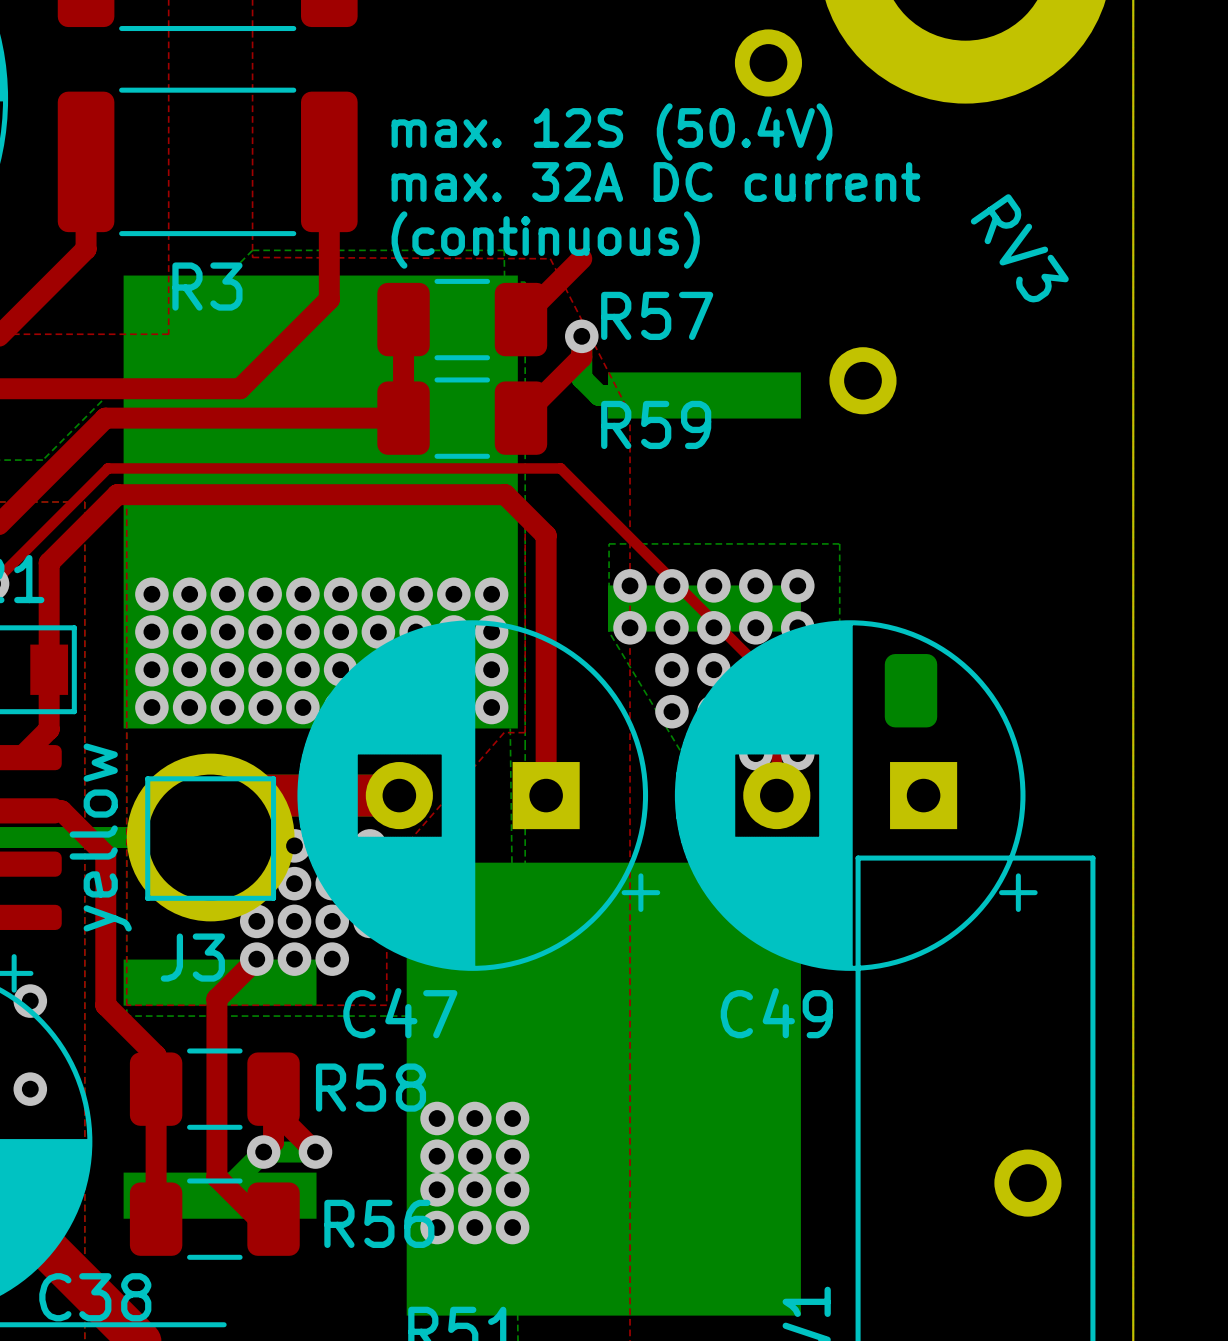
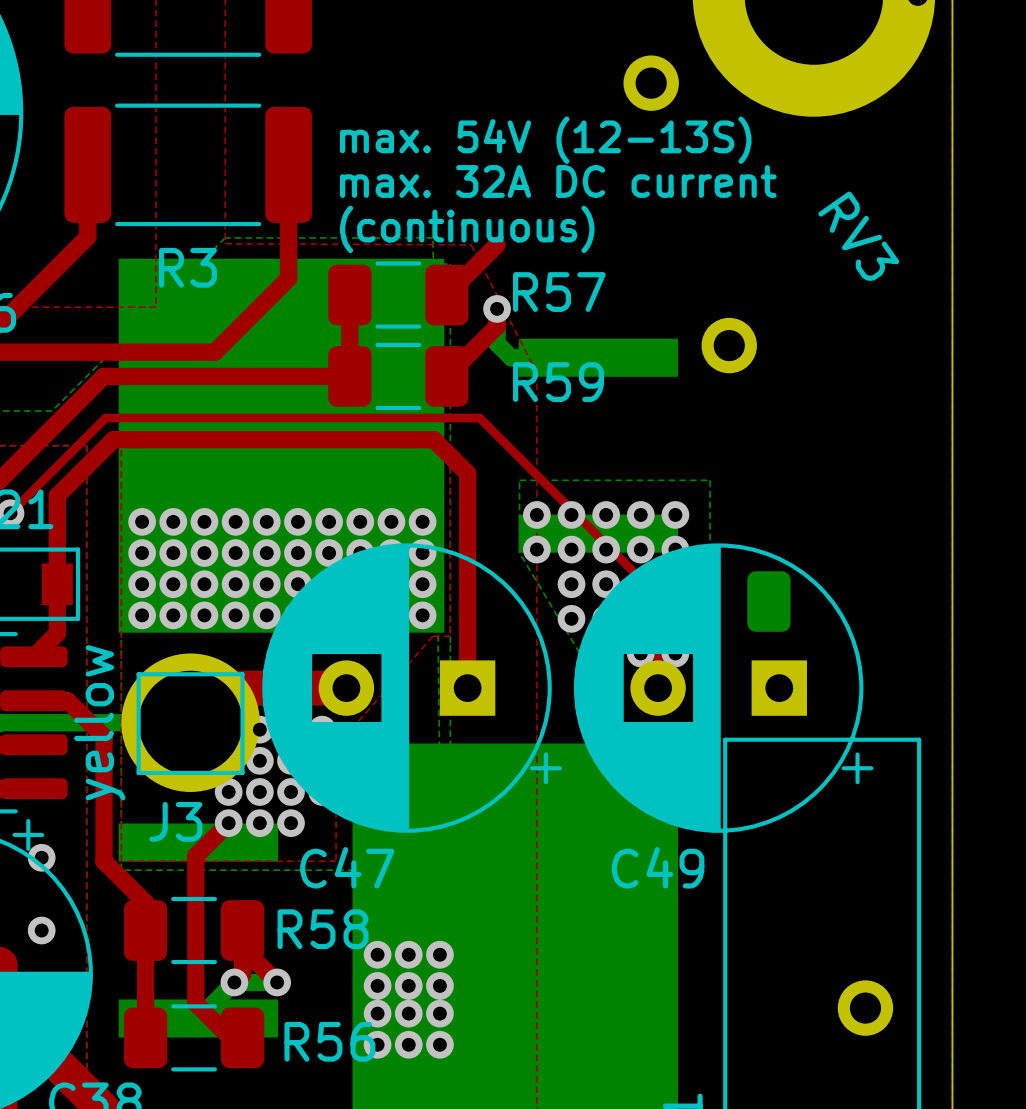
text: max. 12S (50.4V) (611, 131) -> max. 54V (12-13S) (545, 140)

